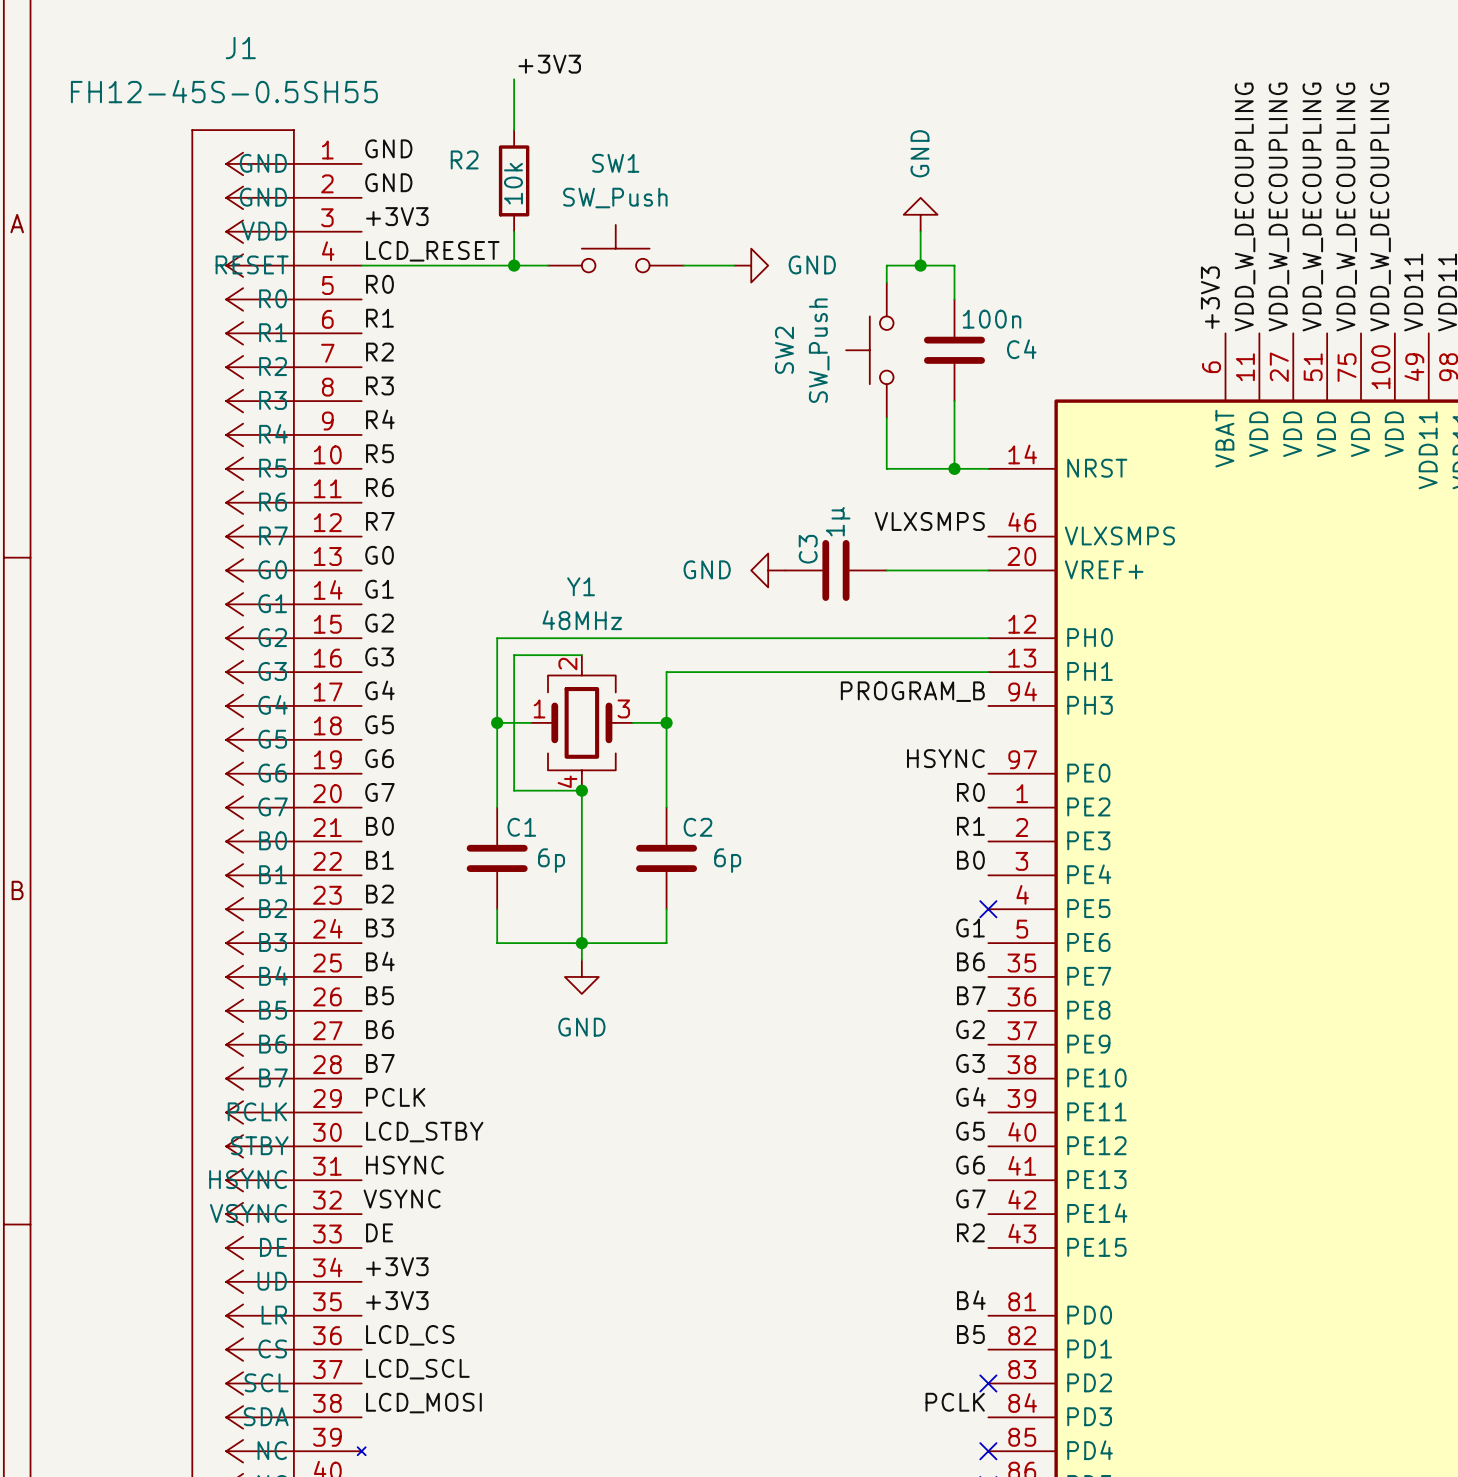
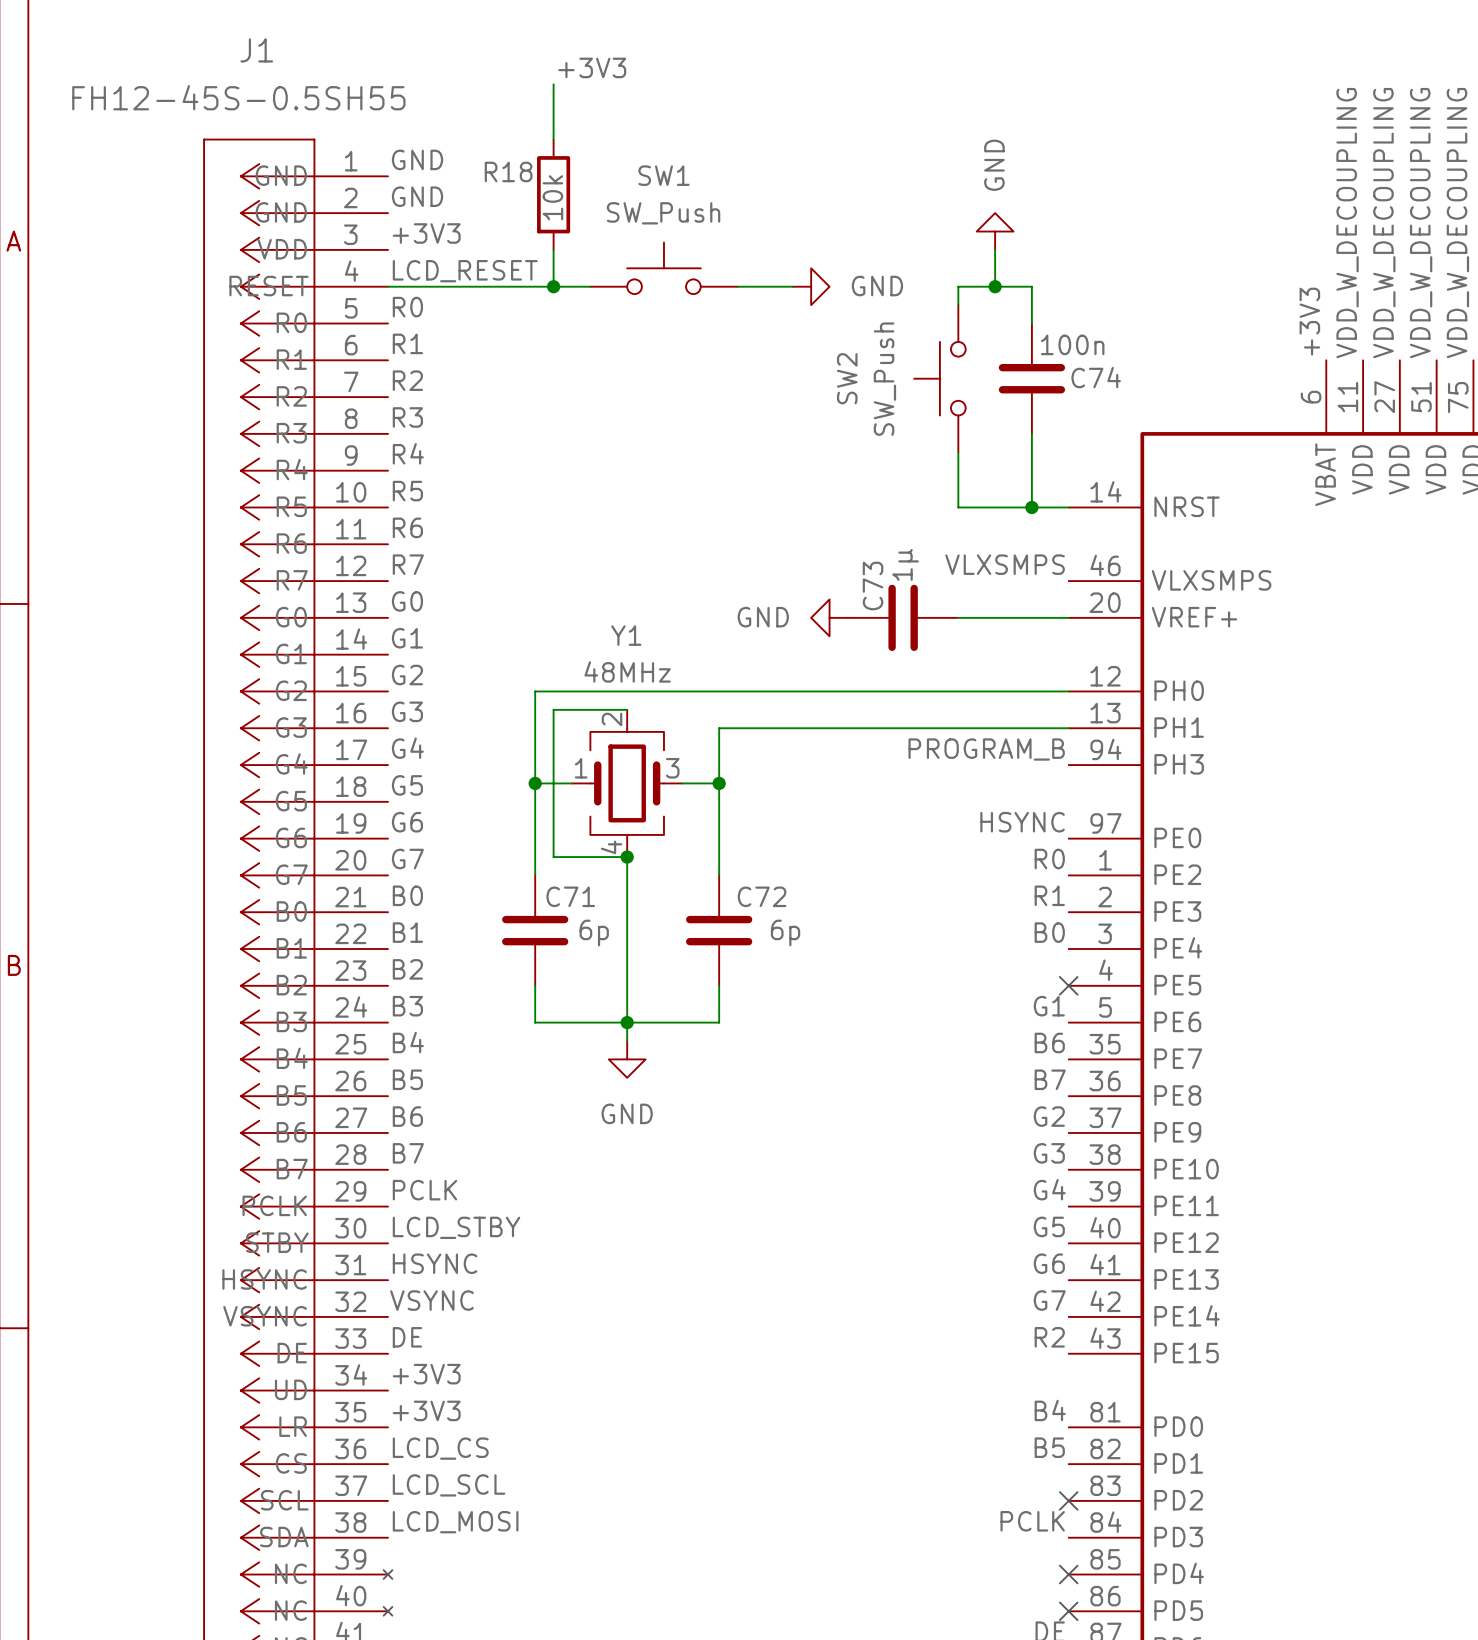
R2 name: R2 (464, 159) -> R18 (508, 171)
C4 name: C4 (1021, 349) -> C74 (1096, 377)
C3 name: C3 (808, 549) -> C73 (873, 586)
C1 name: C1 (521, 827) -> C71 (570, 896)
C2 name: C2 (697, 827) -> C72 (762, 896)

